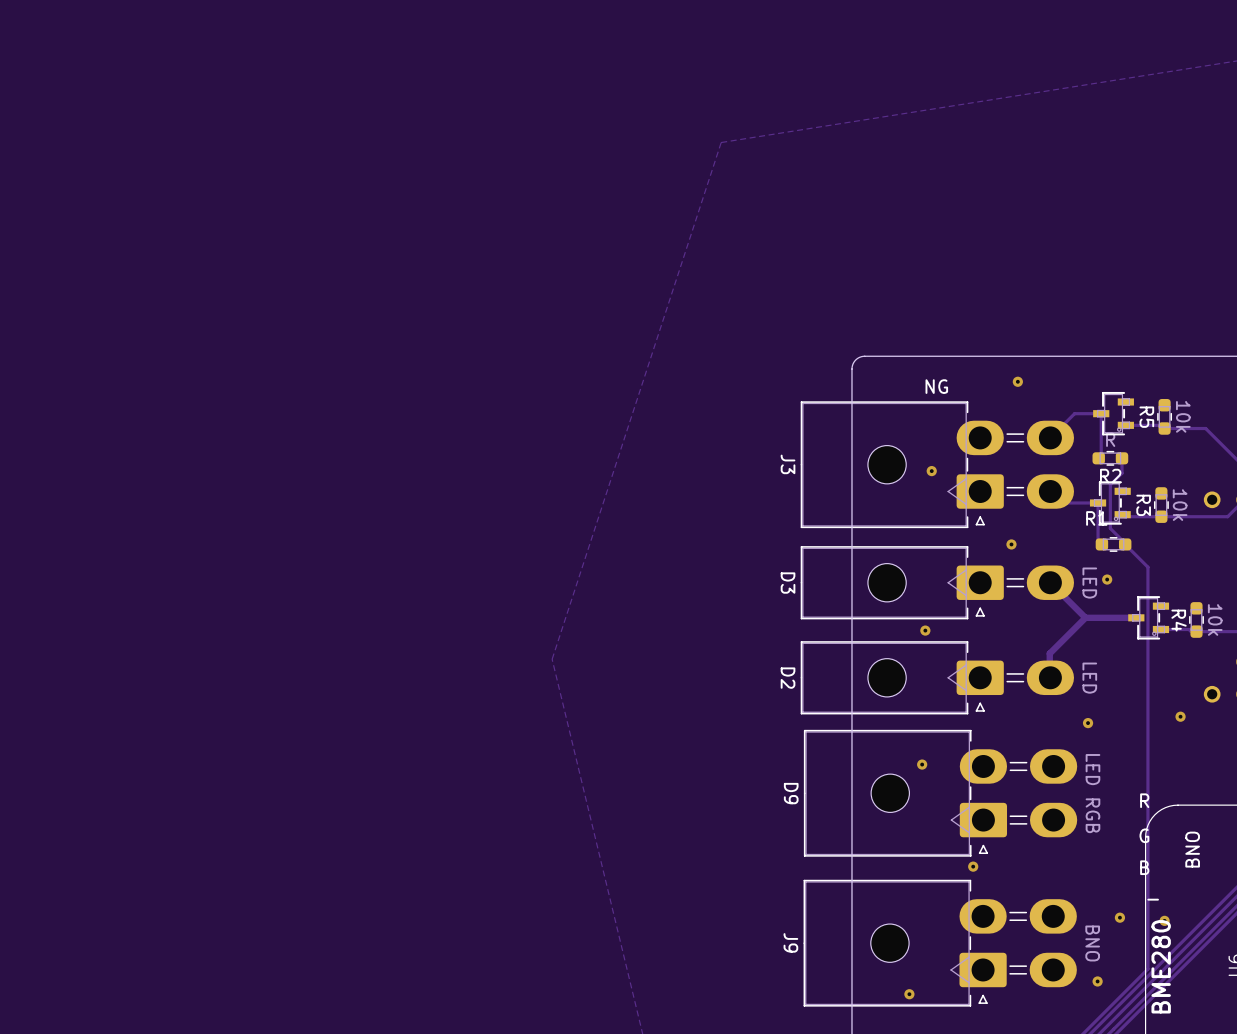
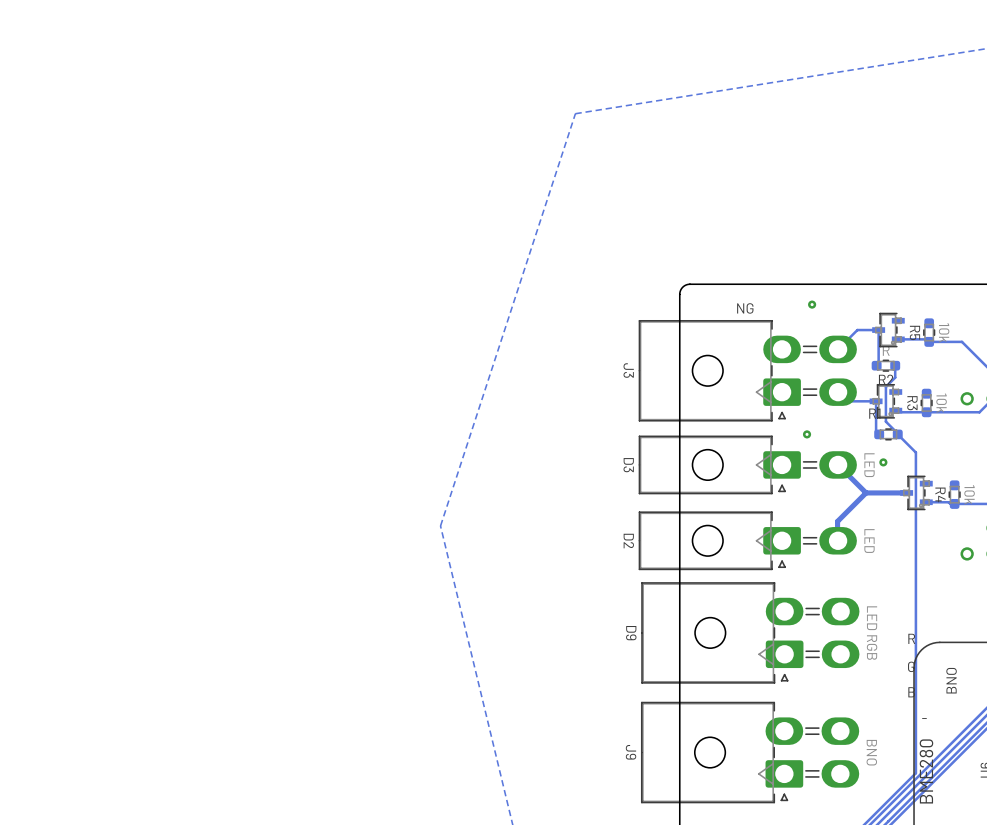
via: (931, 471) -> none
via: (925, 630) -> none
via: (1180, 716) -> none
via: (1088, 723) -> none
via: (922, 764) -> none
via: (973, 866) -> none
via: (1119, 917) -> none
via: (1164, 920) -> none
via: (1097, 981) -> none
via: (909, 994) -> none

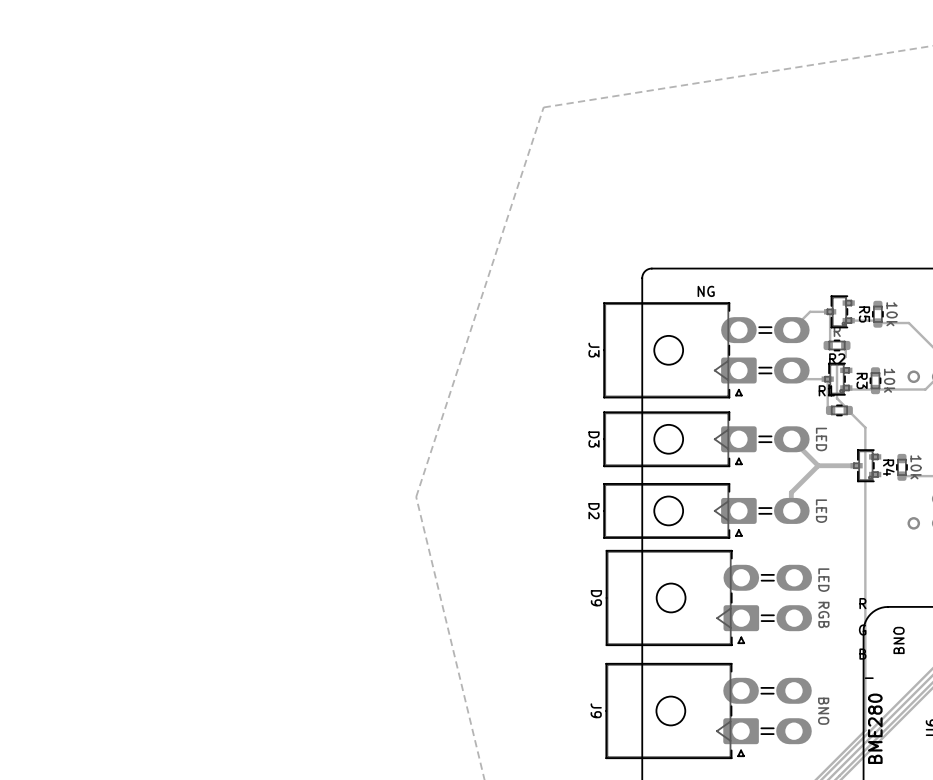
via: (812, 304) -> none
via: (807, 434) -> none
via: (883, 462) -> none
track: (926, 502) (954, 503) -> none

